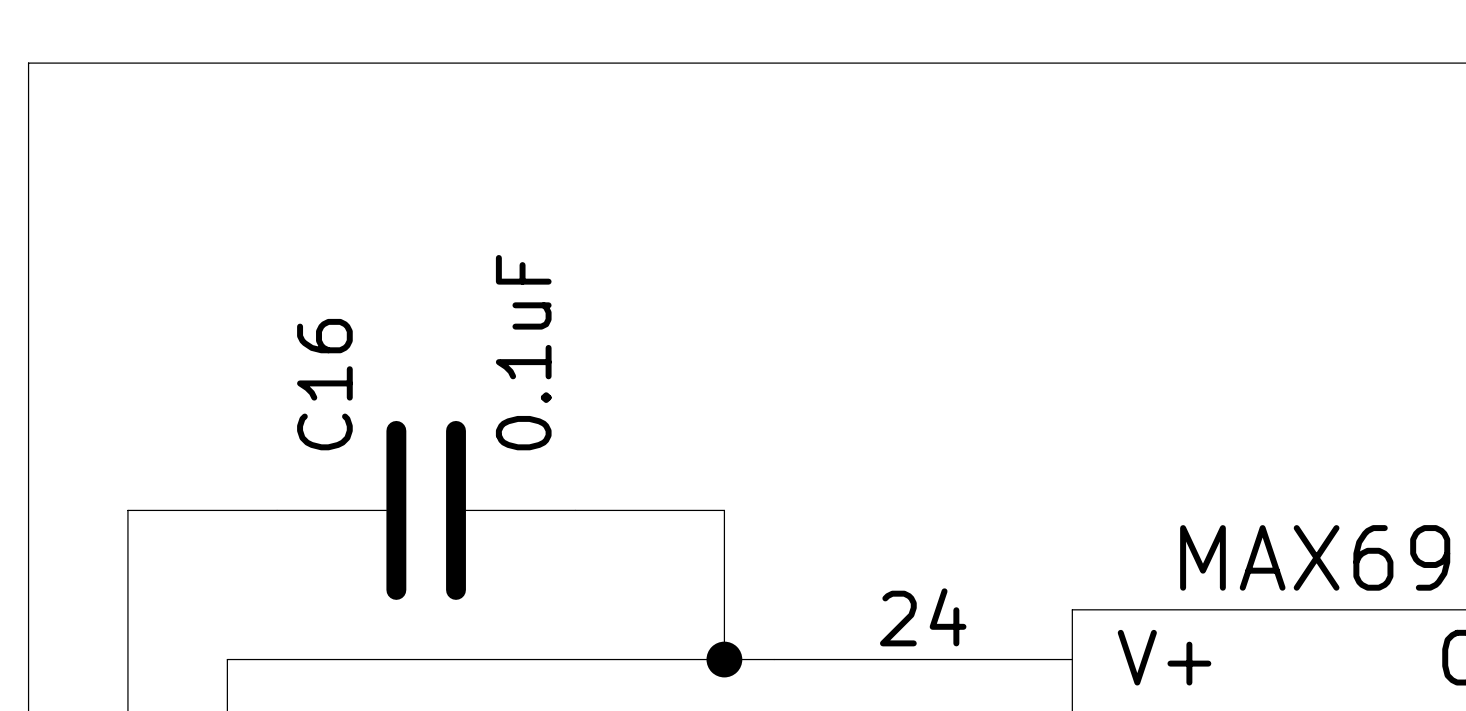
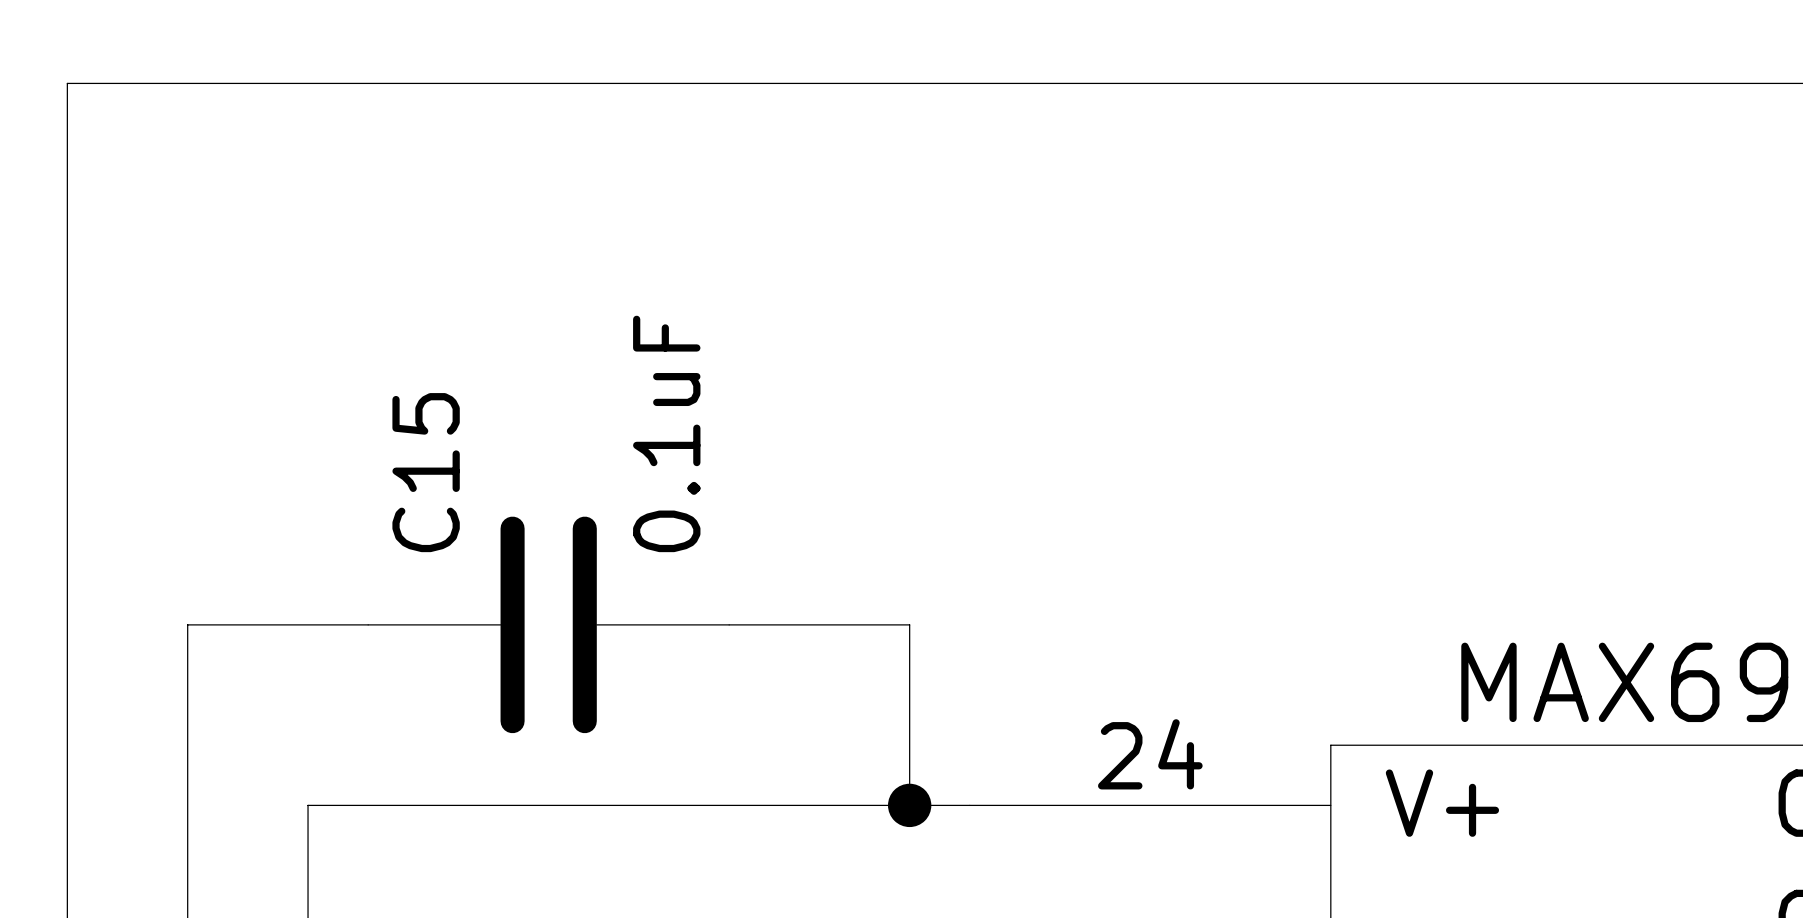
C16 name: C16 (324, 384) -> C15 (426, 472)

